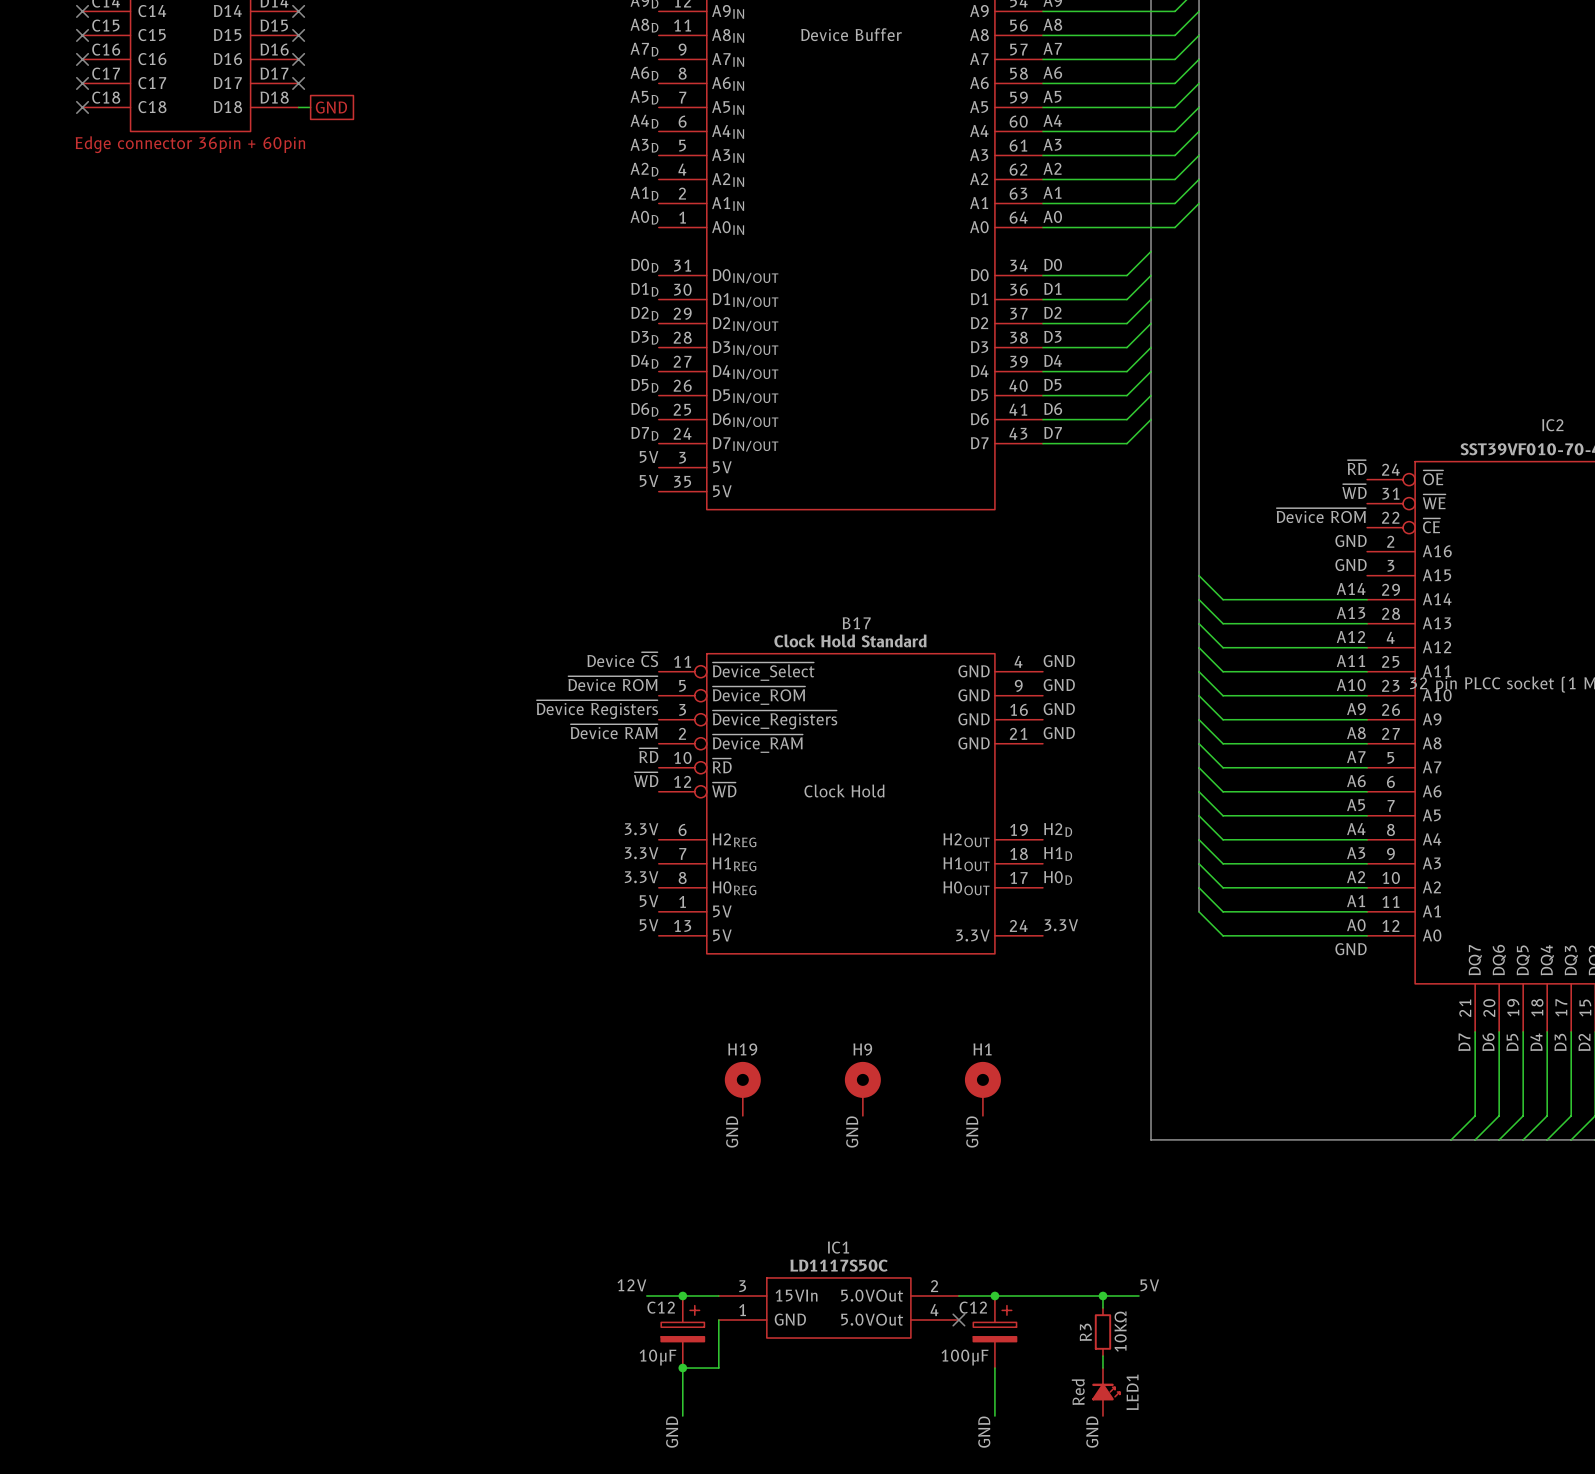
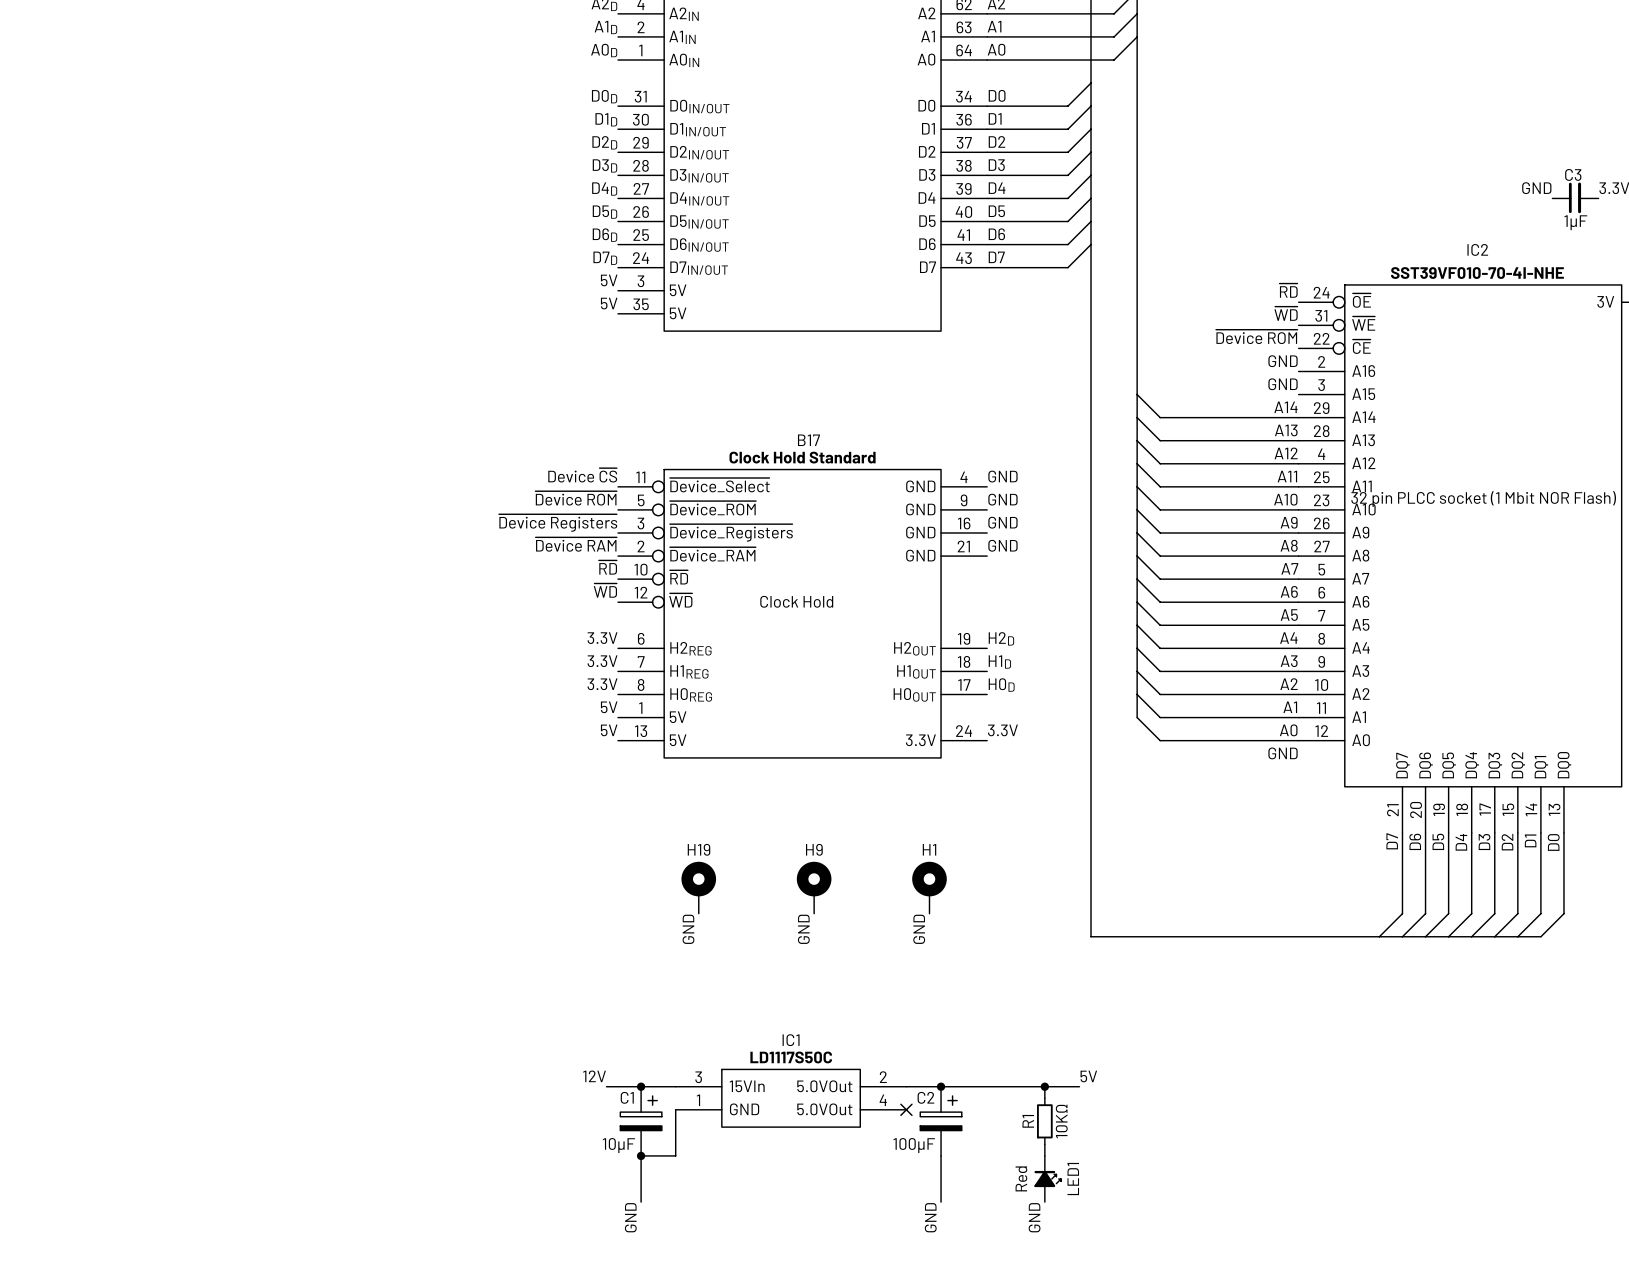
C12 name: C12 (661, 1307) -> C1 (627, 1097)
C12 name: C12 (973, 1307) -> C2 (925, 1097)
R3 name: R3 (1085, 1332) -> R1 (1028, 1121)

